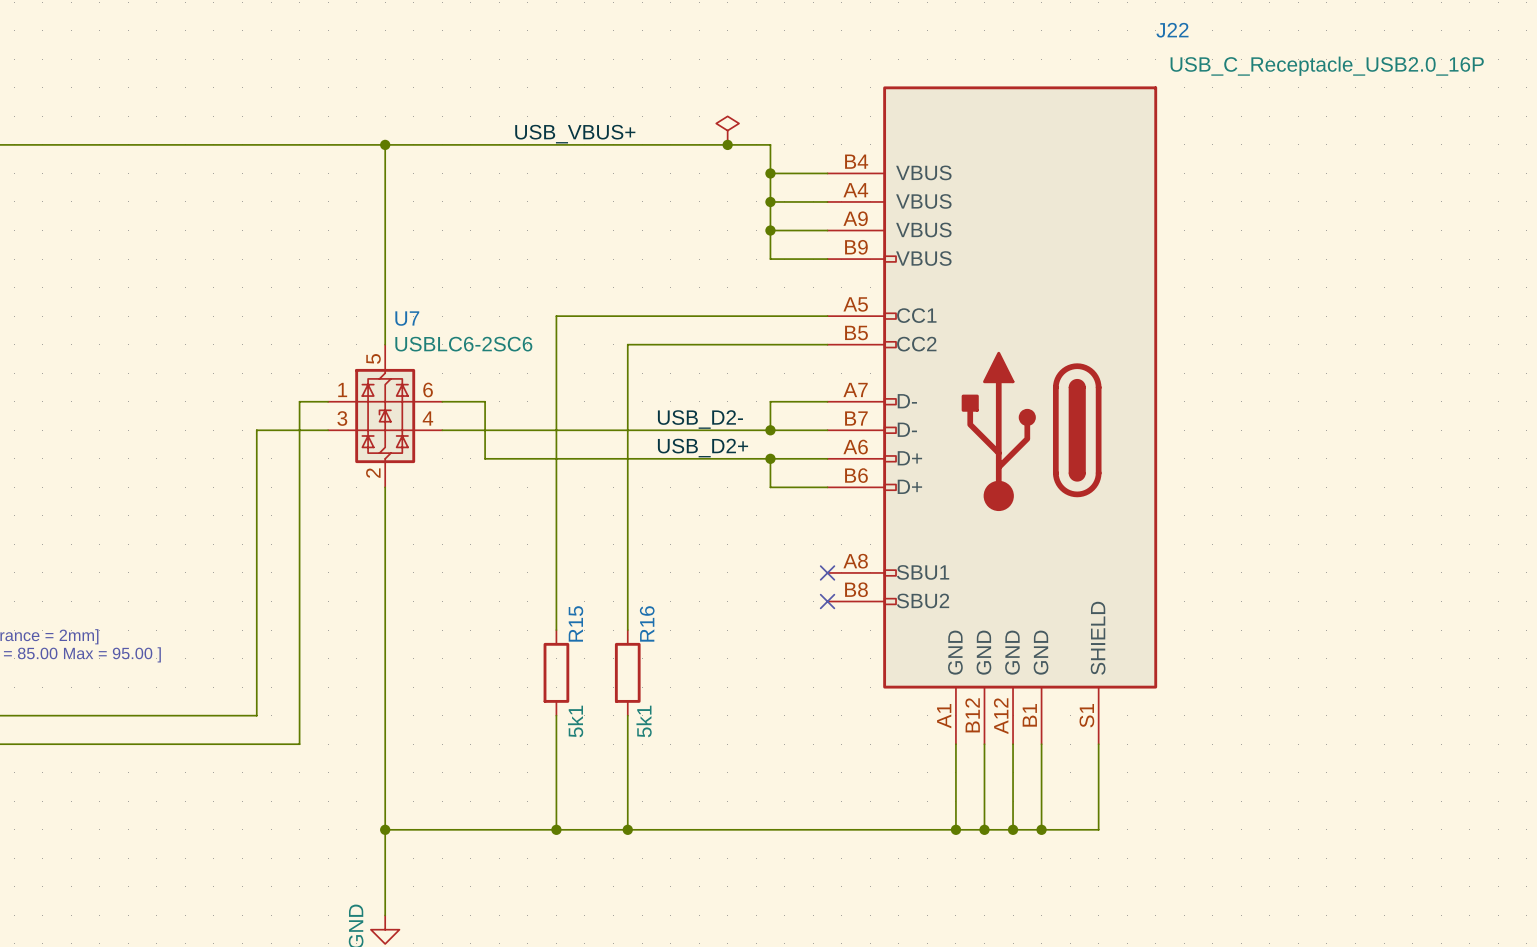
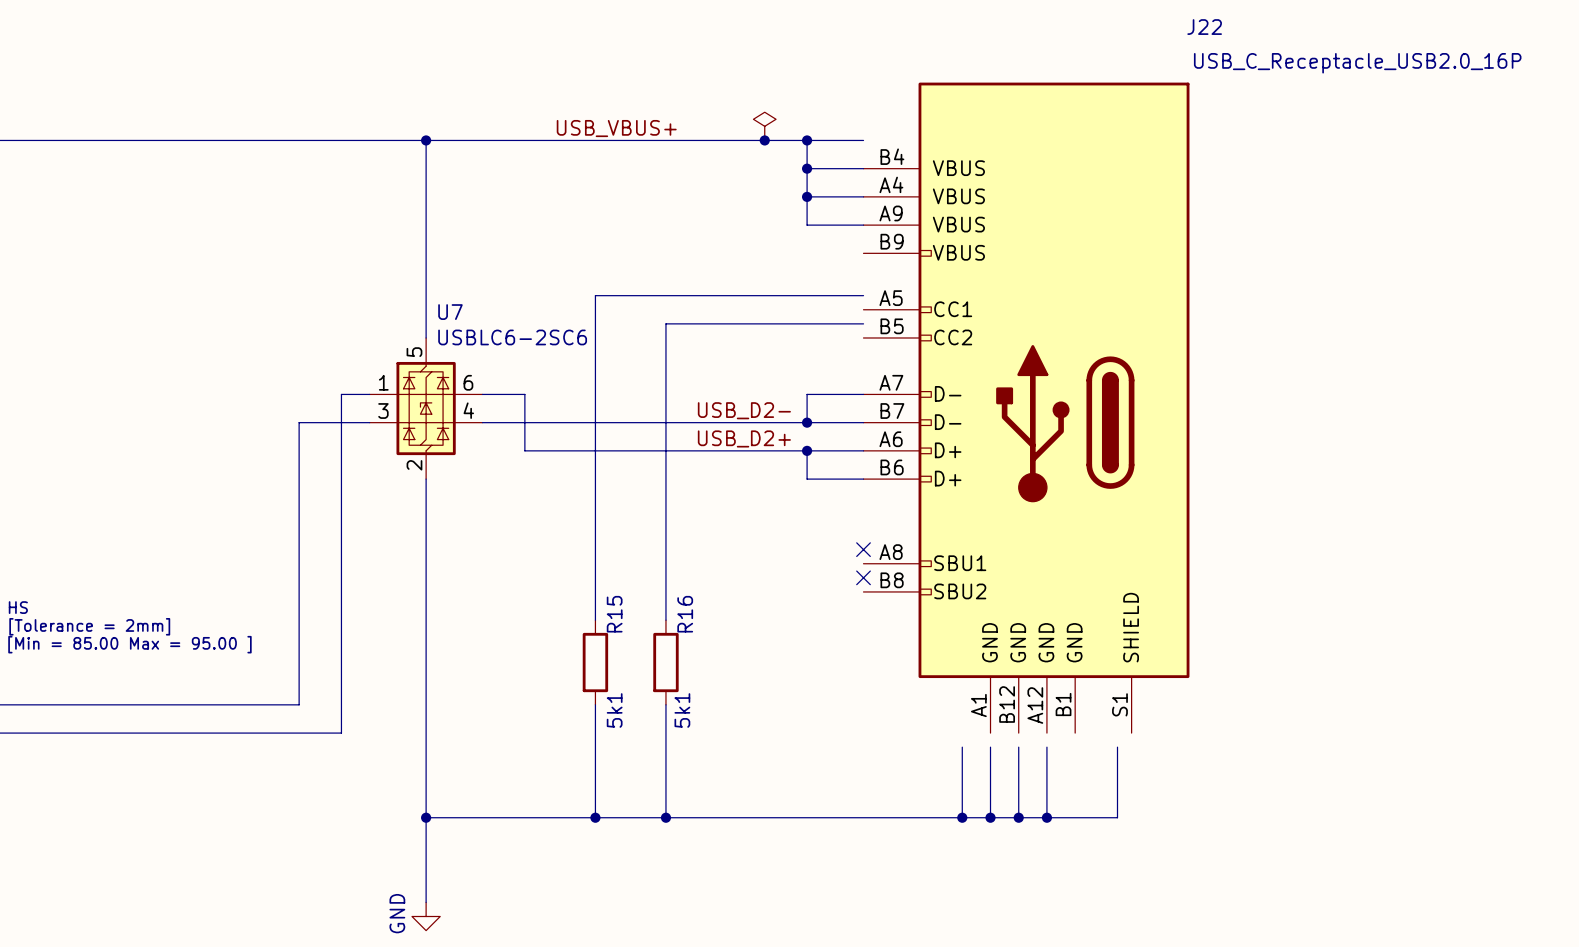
wire: none -> (807, 140) (863, 140)
junction: none -> (807, 140)
wire: (770, 230) (770, 259) (827, 259) -> none
junction: (770, 230) -> none
wire: (556, 316) (827, 316) -> (595, 309) (595, 295) (863, 295)
wire: (627, 344) (827, 344) -> (665, 337) (665, 323) (863, 323)
no-connect mark: none -> (863, 549)
no-connect mark: (827, 572) -> none
no-connect mark: none -> (863, 577)
no-connect mark: (827, 601) -> none
wire: (955, 744) (955, 758) -> none
wire: (984, 744) (984, 758) -> none
wire: (1013, 744) (1013, 758) -> none
wire: (1041, 744) (1041, 829) -> none
wire: (1098, 744) (1098, 829) (1084, 829) -> (1117, 747) (1117, 817)
wire: none -> (962, 747) (962, 817)
junction: none -> (962, 817)
junction: (1041, 829) -> none

